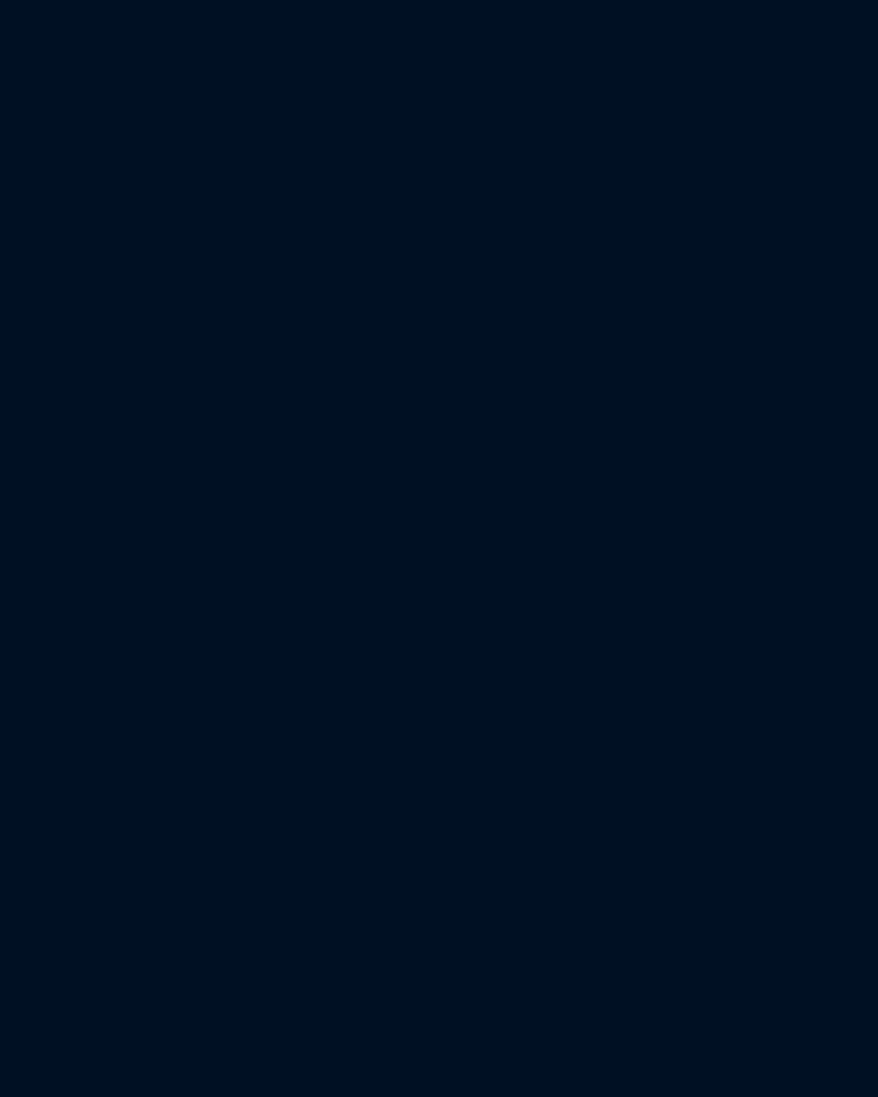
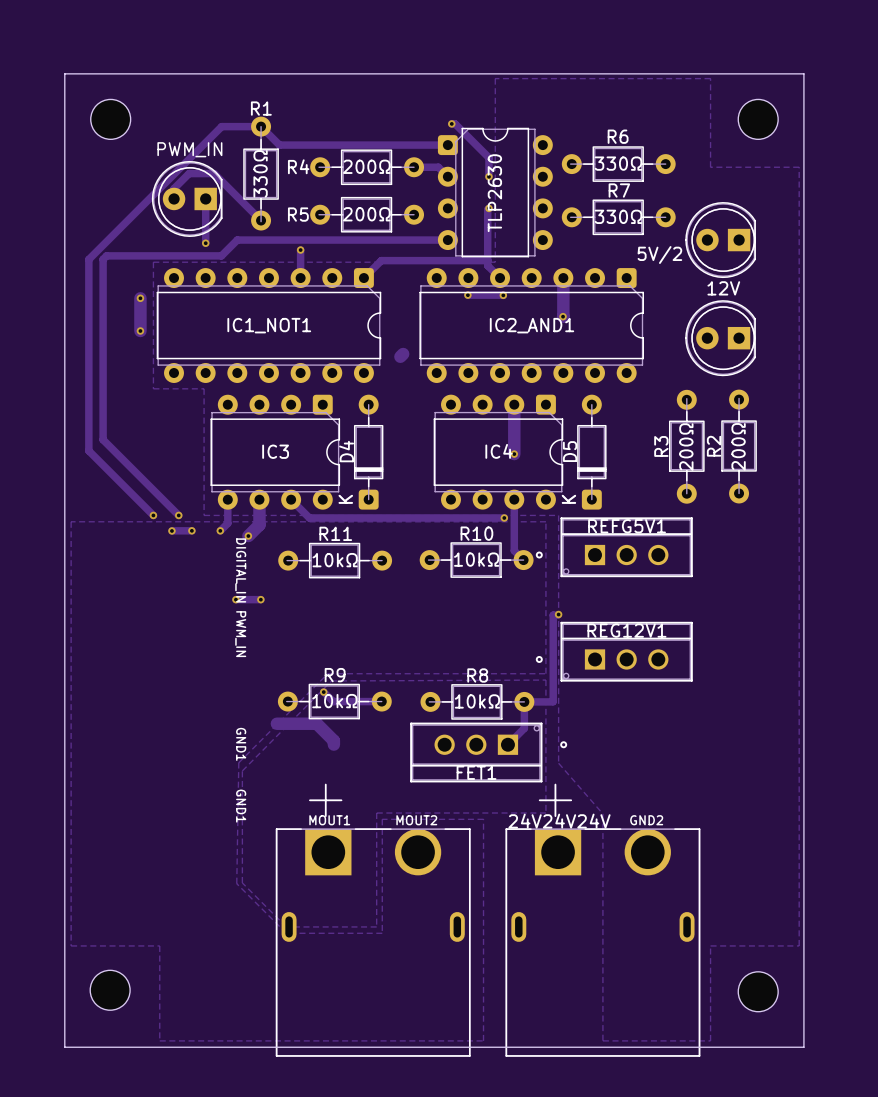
board edge: none -> (64, 73) (803, 73) (803, 1047) (64, 1047) (64, 73)
zone outline: none -> (495, 78) (710, 78) (710, 167) (799, 167) (799, 945) (710, 945) (710, 1040) (602, 1040) (602, 813) (558, 763) (558, 515) (204, 515) (204, 388) (153, 388) (153, 262) (495, 262) (495, 78)
part: none -> (110, 119)
part: none -> (758, 119)
track: none -> (451, 123) (455, 123) (488, 157) (488, 176)
via: none -> (451, 123)
track: none -> (447, 145) (279, 145) (261, 126) (221, 126) (88, 259) (88, 450) (153, 515)
R6: none -> 330Ω (618, 164)
R4: none -> 200Ω (367, 167)
track: none -> (414, 167) (438, 167) (447, 176)
R1: none -> 330Ω (261, 173)
via: none -> (488, 176)
TLP2630: none -> (495, 192)
track: none -> (174, 198) (174, 188) (189, 173) (214, 173) (261, 220)
part: none -> PWM_IN (187, 198)
track: none -> (205, 198) (205, 243)
track: none -> (488, 208) (487, 265) (500, 278)
via: none -> (488, 208)
R5: none -> 200Ω (367, 214)
R7: none -> 330Ω (618, 217)
track: none -> (447, 240) (237, 240) (221, 255) (106, 255) (103, 259) (103, 439) (178, 515)
part: none -> 5V/2 (720, 240)
via: none -> (205, 243)
track: none -> (300, 250) (300, 278)
via: none -> (300, 250)
track: none -> (487, 260) (381, 260) (363, 278) (363, 284)
track: none -> (563, 278) (563, 316)
track: none -> (467, 295) (503, 295)
via: none -> (467, 295)
via: none -> (503, 295)
track: none -> (140, 298) (140, 330)
via: none -> (140, 298)
via: none -> (563, 316)
IC1_NOT1: none -> (268, 325)
IC2_AND1: none -> (531, 325)
via: none -> (140, 330)
part: none -> 12V (720, 338)
track: none -> (403, 354) (400, 356)
track: none -> (515, 403) (514, 404) (514, 454)
R3: none -> 200Ω (686, 446)
R2: none -> 200Ω (739, 446)
IC3: none -> (275, 452)
D4: none -> (368, 452)
IC4: none -> (498, 452)
D5: none -> (591, 452)
via: none -> (514, 454)
track: none -> (227, 499) (227, 523) (220, 530)
track: none -> (259, 499) (259, 524) (248, 536)
track: none -> (291, 499) (309, 517) (504, 517)
track: none -> (514, 499) (514, 550) (523, 560)
via: none -> (153, 515)
via: none -> (178, 515)
via: none -> (504, 517)
zone outline: none -> (71, 521) (545, 521) (545, 673) (327, 673) (238, 762) (236, 883) (286, 933) (382, 933) (382, 819) (483, 819) (483, 1040) (159, 1040) (159, 945) (71, 945) (71, 521)
via: none -> (171, 530)
track: none -> (172, 530) (191, 530)
via: none -> (191, 530)
via: none -> (220, 530)
via: none -> (248, 536)
REFG5V1: none -> (614, 547)
R11: none -> 10kΩ (335, 560)
R10: none -> 10kΩ (476, 560)
text: none -> DIGITAL_IN (240, 570)
track: none -> (235, 599) (260, 599)
via: none -> (235, 599)
via: none -> (260, 599)
track: none -> (558, 614) (553, 615) (553, 701) (524, 701) (524, 728) (507, 744)
via: none -> (558, 614)
text: none -> PWM_IN (240, 634)
REG12V1: none -> (614, 651)
zone outline: none -> (545, 680) (545, 813) (376, 813) (376, 926) (286, 926) (242, 882) (242, 770) (331, 680) (545, 680)
track: none -> (323, 692) (333, 701) (381, 701)
via: none -> (323, 692)
R9: none -> 10kΩ (334, 701)
R8: none -> 10kΩ (477, 701)
track: none -> (276, 723) (316, 723) (333, 740) (333, 744)
text: none -> GND1 (241, 744)
FET1: none -> (488, 752)
text: none -> GND1 (241, 806)
text: none -> MOUT1 (329, 820)
text: none -> MOUT2 (416, 820)
text: none -> GND2 (646, 820)
text: none -> 24V24V24V (559, 821)
part: none -> (373, 920)
part: none -> (602, 920)
part: none -> (110, 990)
part: none -> (758, 991)

